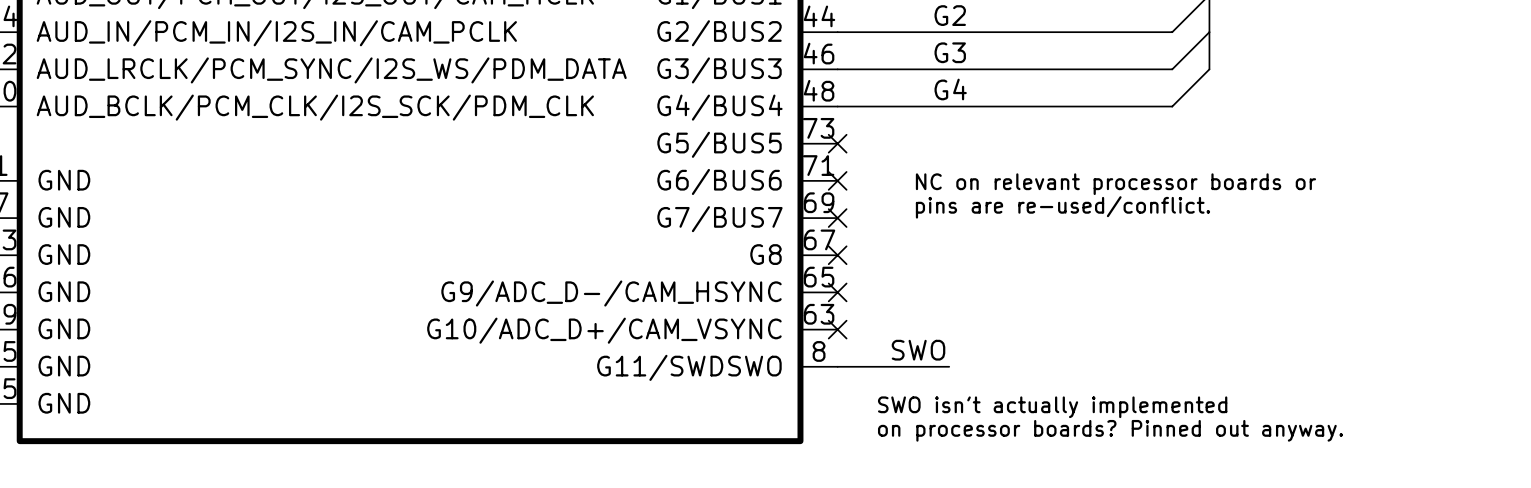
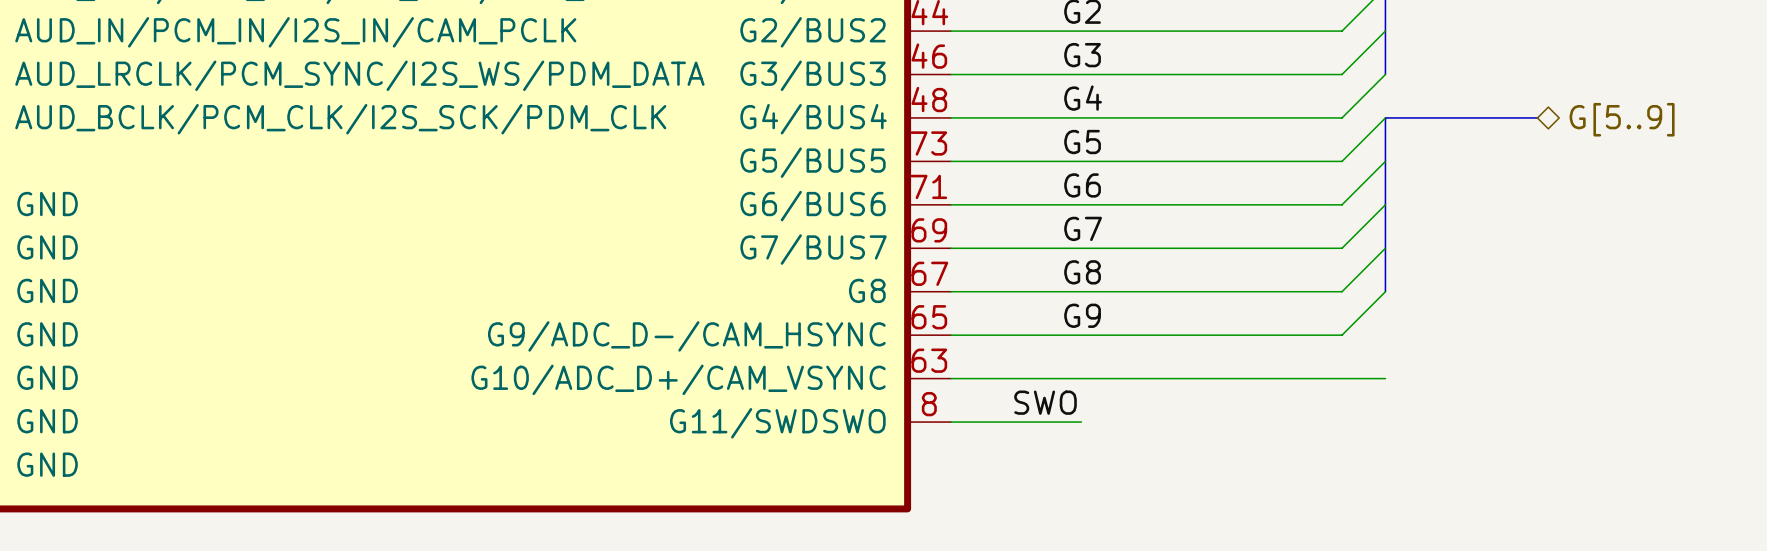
wire: none -> (1385, 117) (1342, 161) (951, 161)
bus: none -> (1537, 117) (1385, 117) (1385, 291)
hierarchical label: none -> G[5..9] (1622, 119)
label: none -> G5 (1082, 142)
no-connect mark: (837, 143) -> none
wire: none -> (1385, 161) (1342, 204) (951, 204)
label: none -> G6 (1082, 185)
no-connect mark: (837, 180) -> none
wire: none -> (1385, 204) (1342, 248) (951, 248)
text: NC on relevant processor boards or (1115, 184) -> none
label: none -> G7 (1083, 228)
text: pins are re-used/conflict. (1062, 207) -> none
no-connect mark: (837, 218) -> none
wire: none -> (1385, 248) (1342, 291) (951, 291)
label: none -> G8 (1082, 272)
no-connect mark: (837, 255) -> none
wire: none -> (1385, 291) (1342, 335) (951, 335)
label: none -> G9 (1082, 315)
no-connect mark: (837, 292) -> none
wire: none -> (951, 378) (1385, 378)
no-connect mark: (837, 329) -> none
text: SWO isn't actually implemented (1052, 407) -> none
text: on processor boards? Pinned out anyway. (1110, 430) -> none

